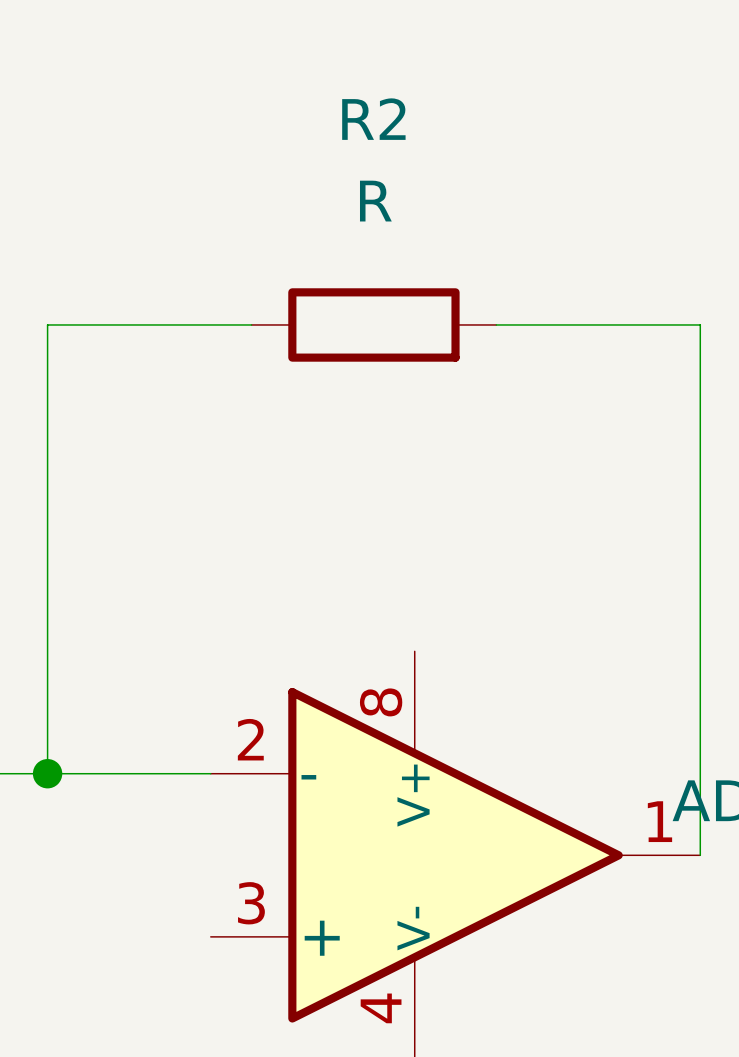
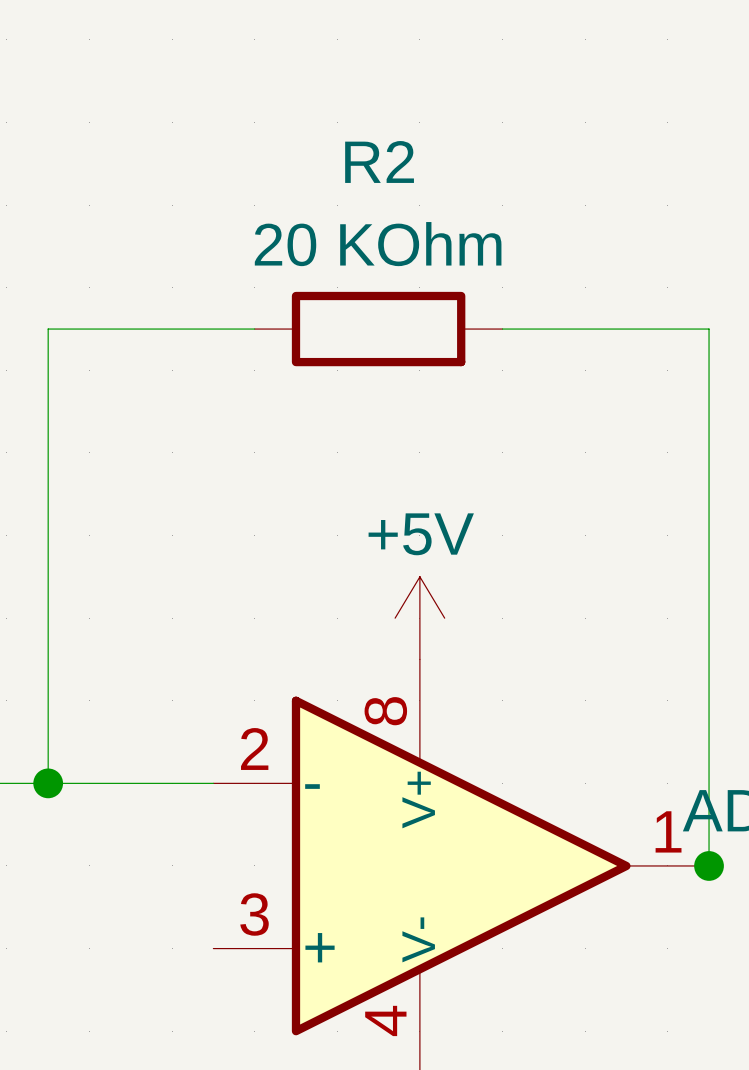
R2 name position: R2 (373, 119) -> R2 (379, 161)
R2 value: R (375, 201) -> 20 KOhm (378, 244)
power symbol: none -> +5V (419, 618)
junction: none -> (709, 865)

